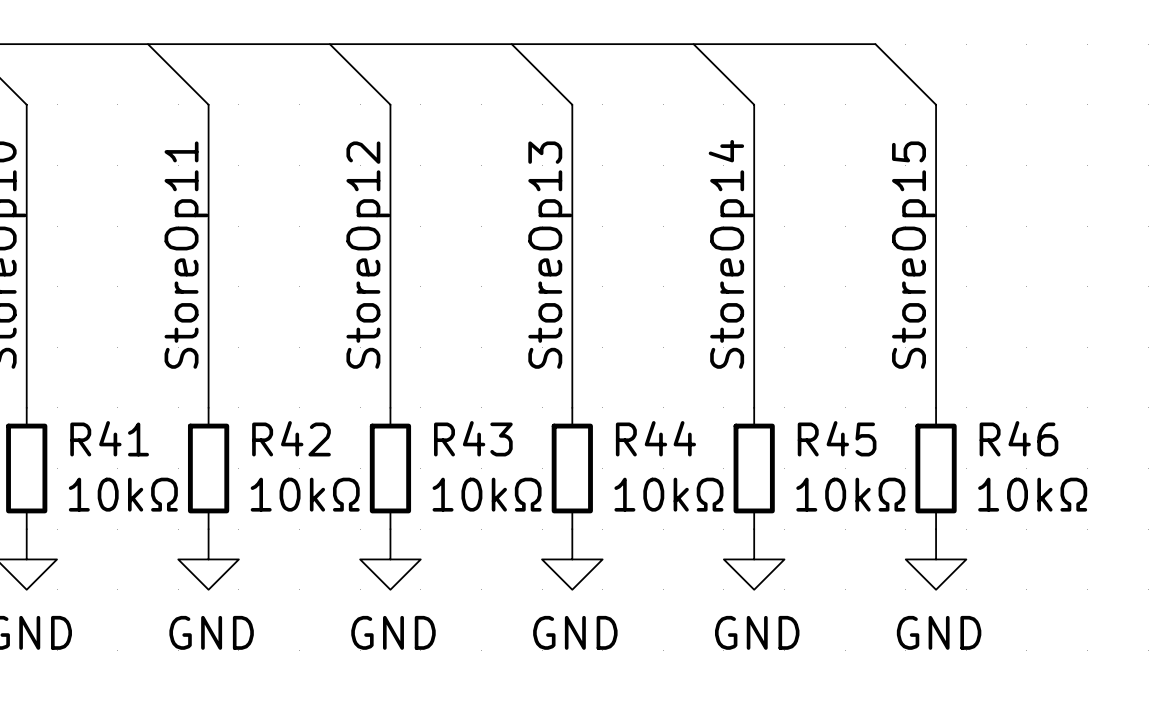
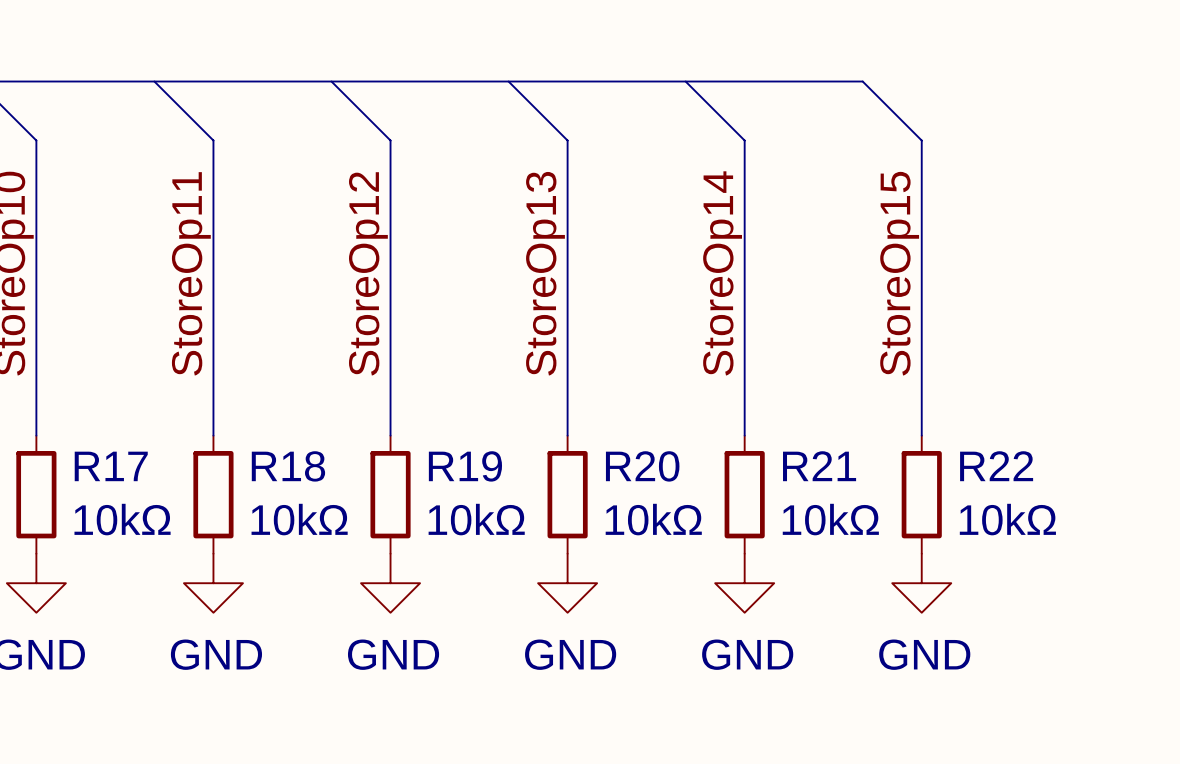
R41 name: R41 (109, 438) -> R17 (111, 466)
R42 name: R42 (291, 438) -> R18 (288, 466)
R43 name: R43 (473, 438) -> R19 (465, 466)
R44 name: R44 (655, 438) -> R20 (642, 466)
R45 name: R45 (837, 438) -> R21 (819, 466)
R46 name: R46 (1018, 438) -> R22 (996, 466)

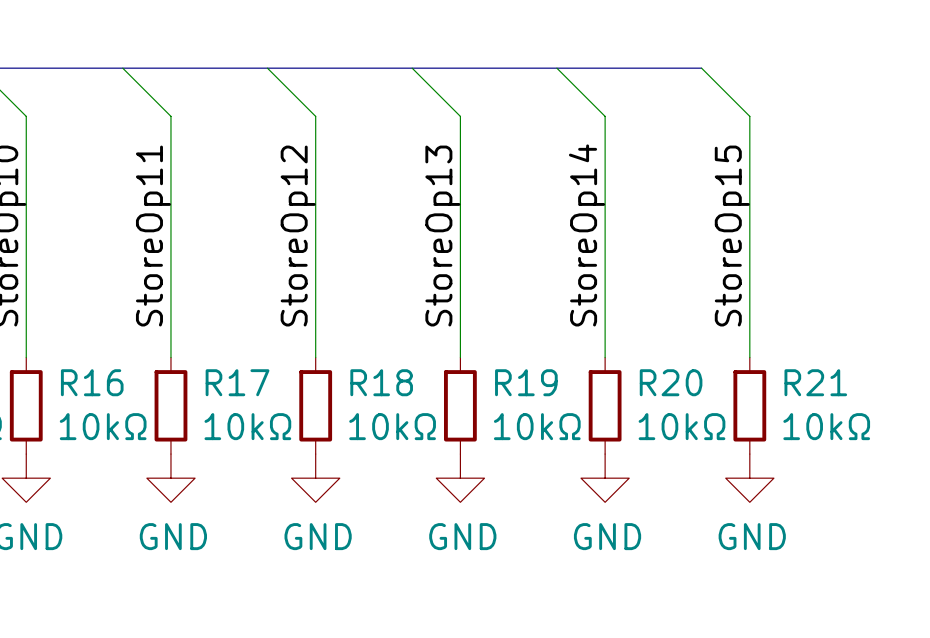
R17 name: R17 (111, 466) -> R16 (92, 382)
R18 name: R18 (288, 466) -> R17 (237, 382)
R19 name: R19 (465, 466) -> R18 (381, 382)
R20 name: R20 (642, 466) -> R19 (526, 382)
R21 name: R21 (819, 466) -> R20 (671, 382)
R22 name: R22 (996, 466) -> R21 (815, 382)

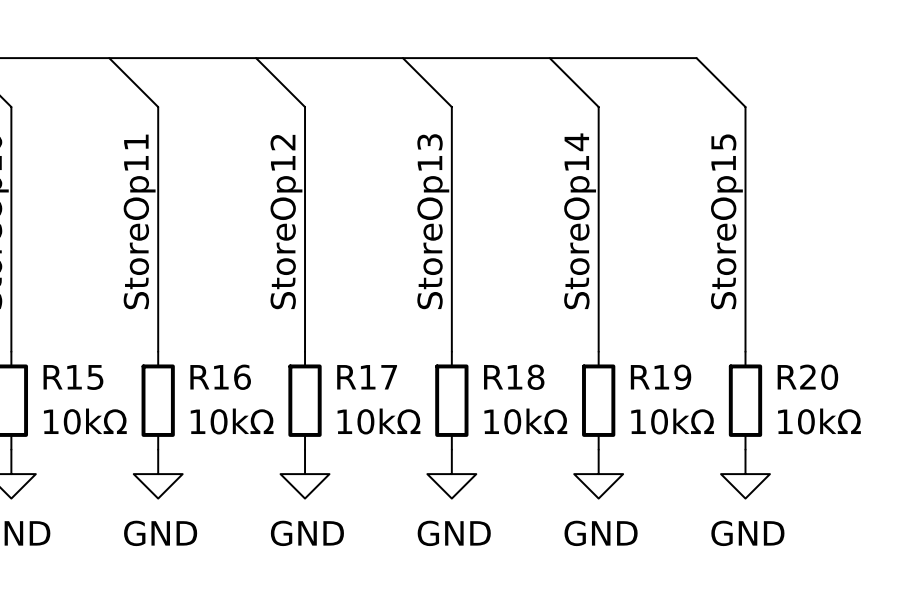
R16 name: R16 (92, 382) -> R15 (73, 377)
R17 name: R17 (237, 382) -> R16 (220, 377)
R18 name: R18 (381, 382) -> R17 (367, 377)
R19 name: R19 (526, 382) -> R18 (514, 377)
R20 name: R20 (671, 382) -> R19 (661, 377)
R21 name: R21 (815, 382) -> R20 (807, 377)

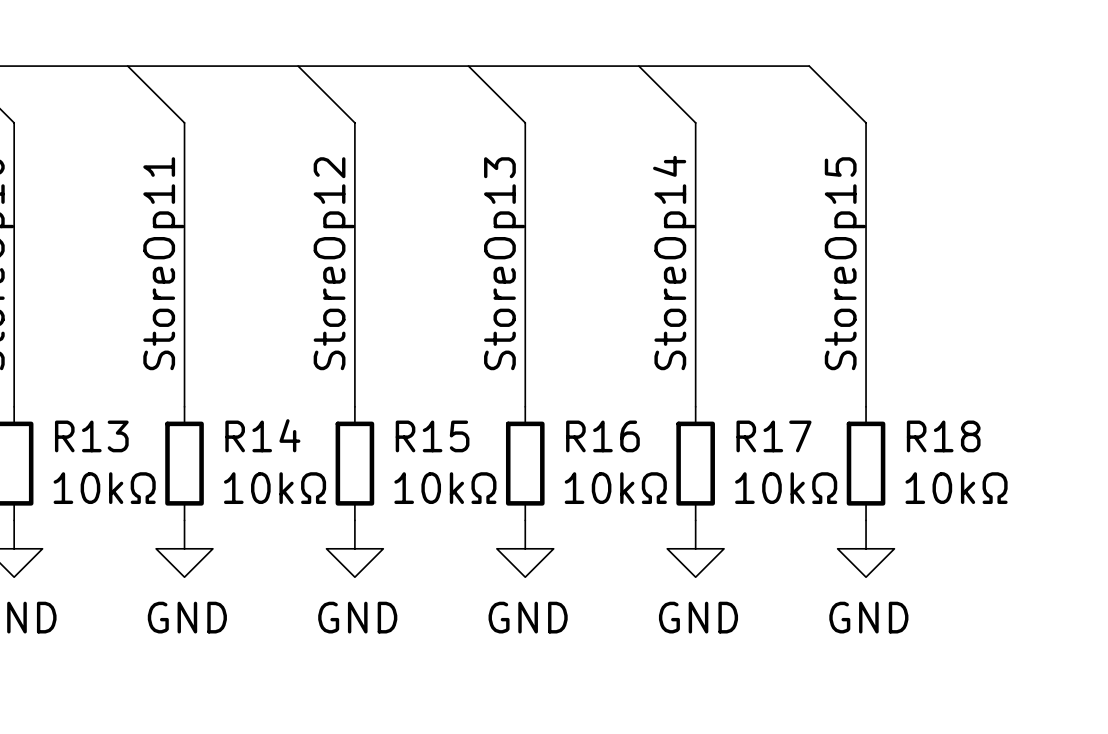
R15 name: R15 (73, 377) -> R13 (91, 436)
R16 name: R16 (220, 377) -> R14 (262, 435)
R17 name: R17 (367, 377) -> R15 (432, 436)
R18 name: R18 (514, 377) -> R16 (602, 436)
R19 name: R19 (661, 377) -> R17 (774, 436)
R20 name: R20 (807, 377) -> R18 (943, 436)

